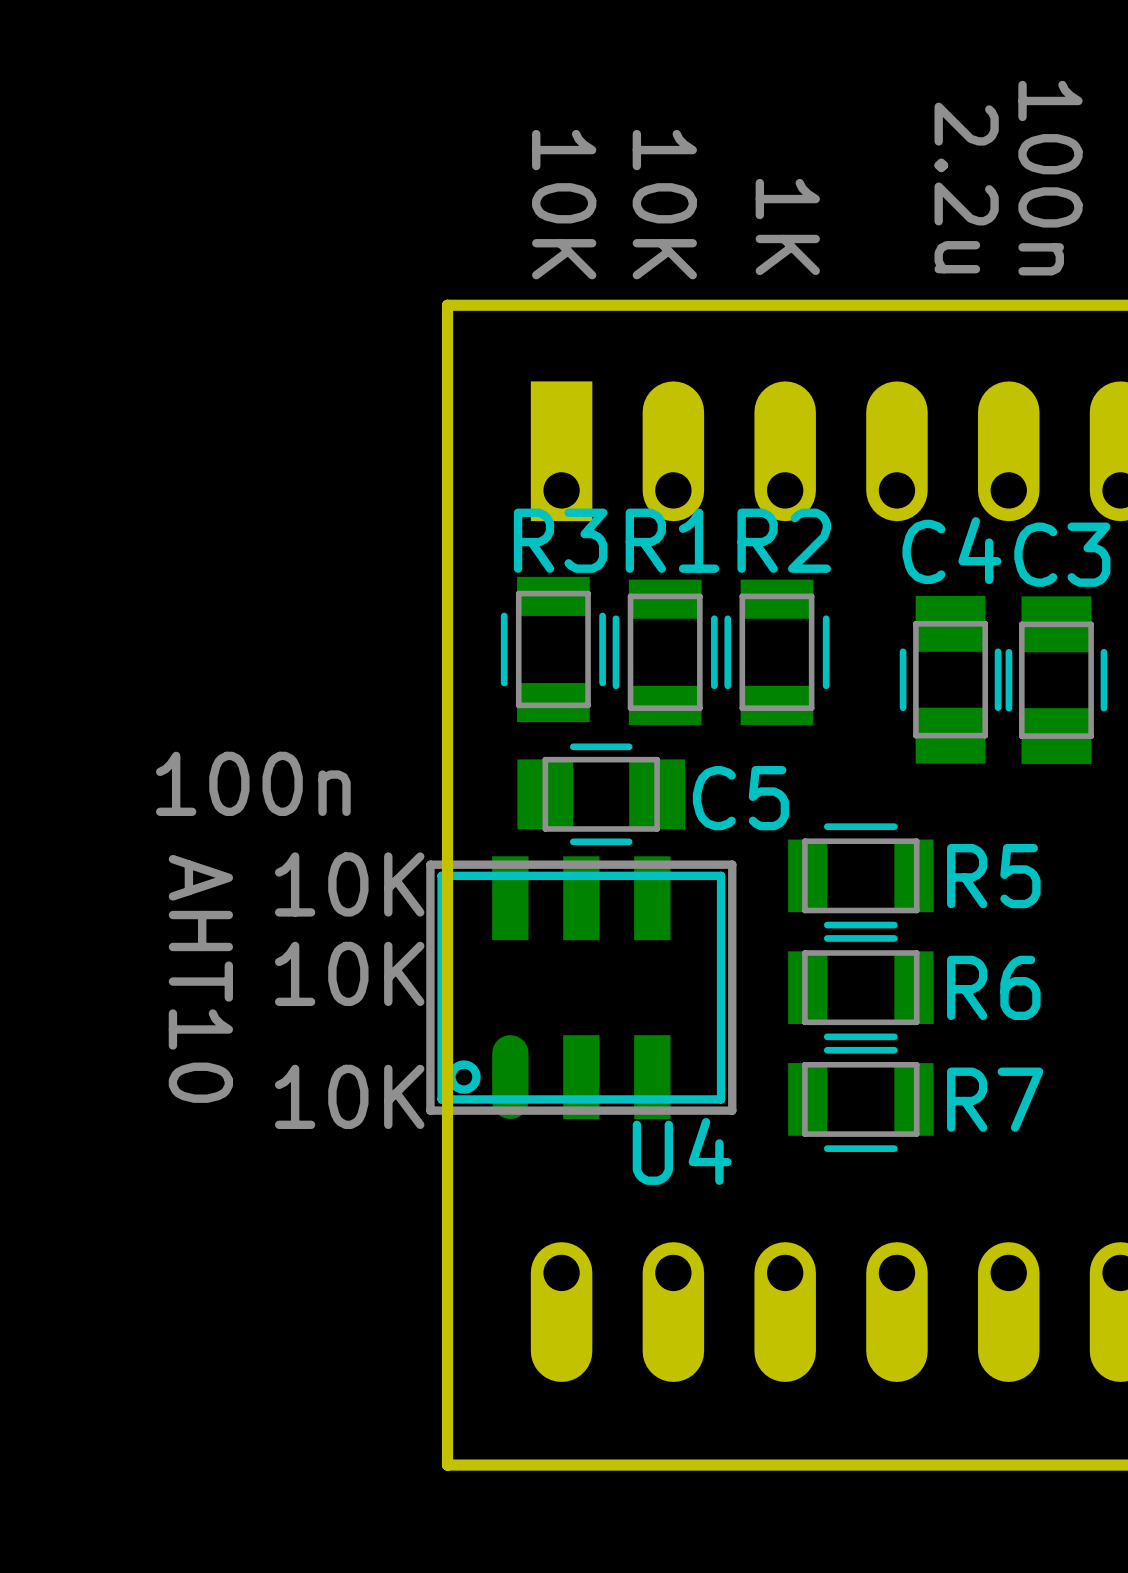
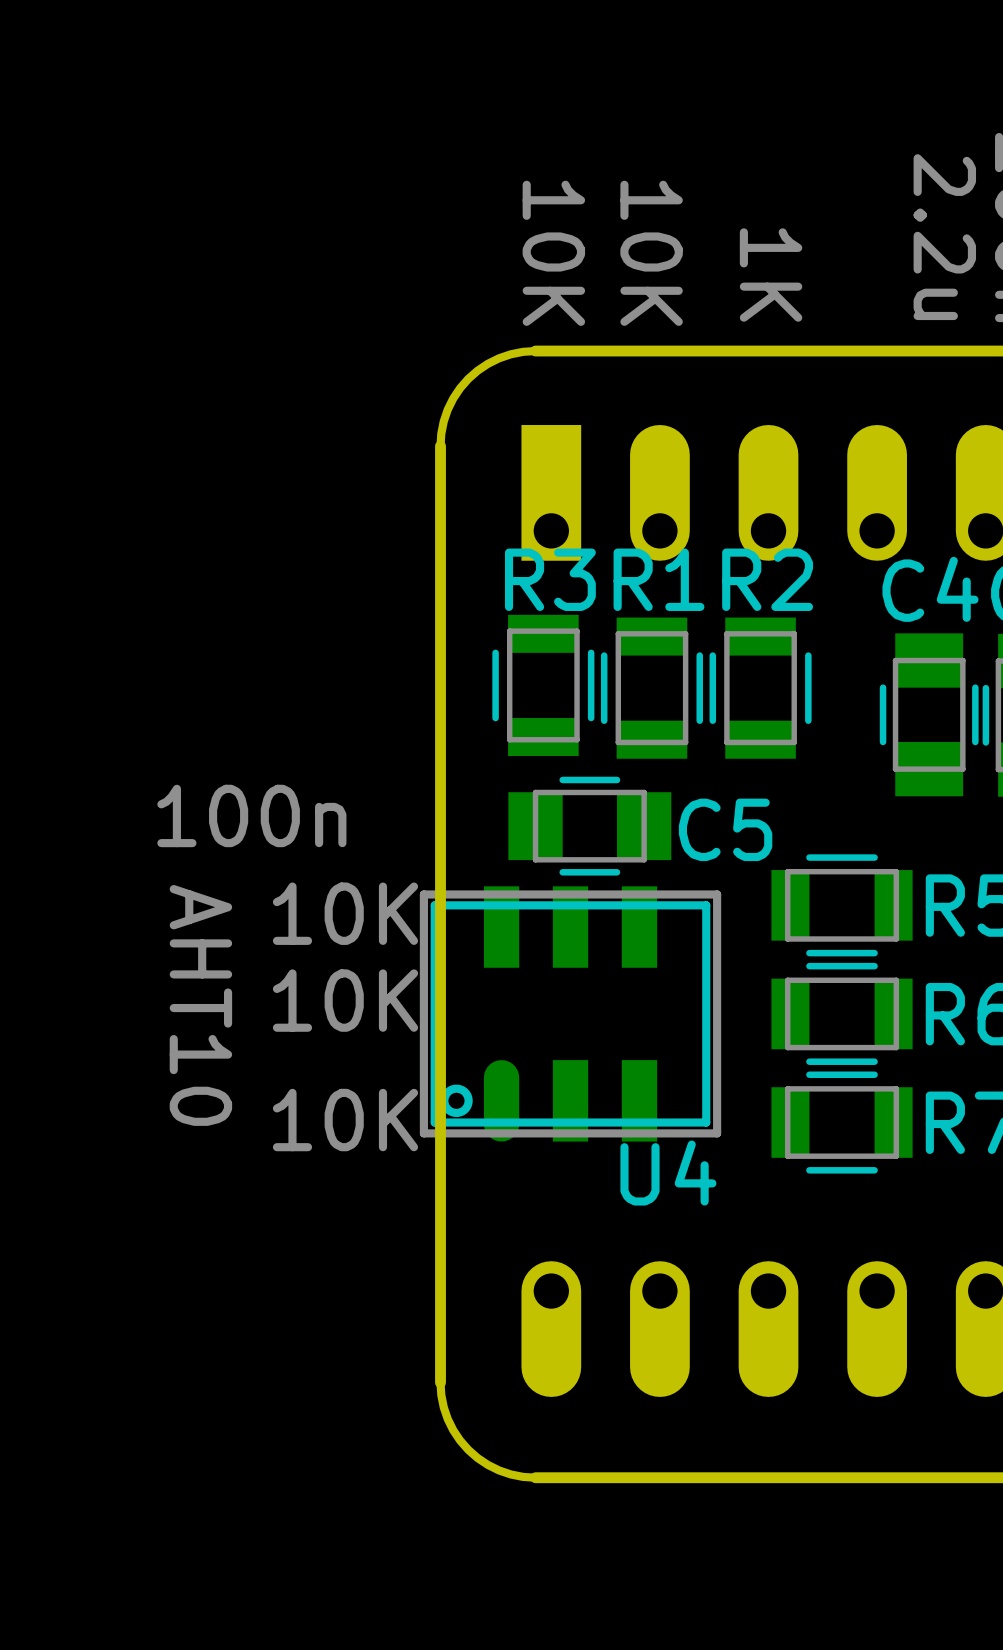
board edge: (545, 305) (447, 305) (447, 403) -> (535, 351) (510, 354) (499, 358) (477, 370) (468, 378) (460, 388) (447, 409) (441, 433) (440, 446)
board edge: (447, 1367) (447, 1465) (545, 1465) -> (440, 1382) (441, 1395) (447, 1419) (460, 1440) (468, 1449) (477, 1458) (499, 1470) (510, 1474) (535, 1477)

